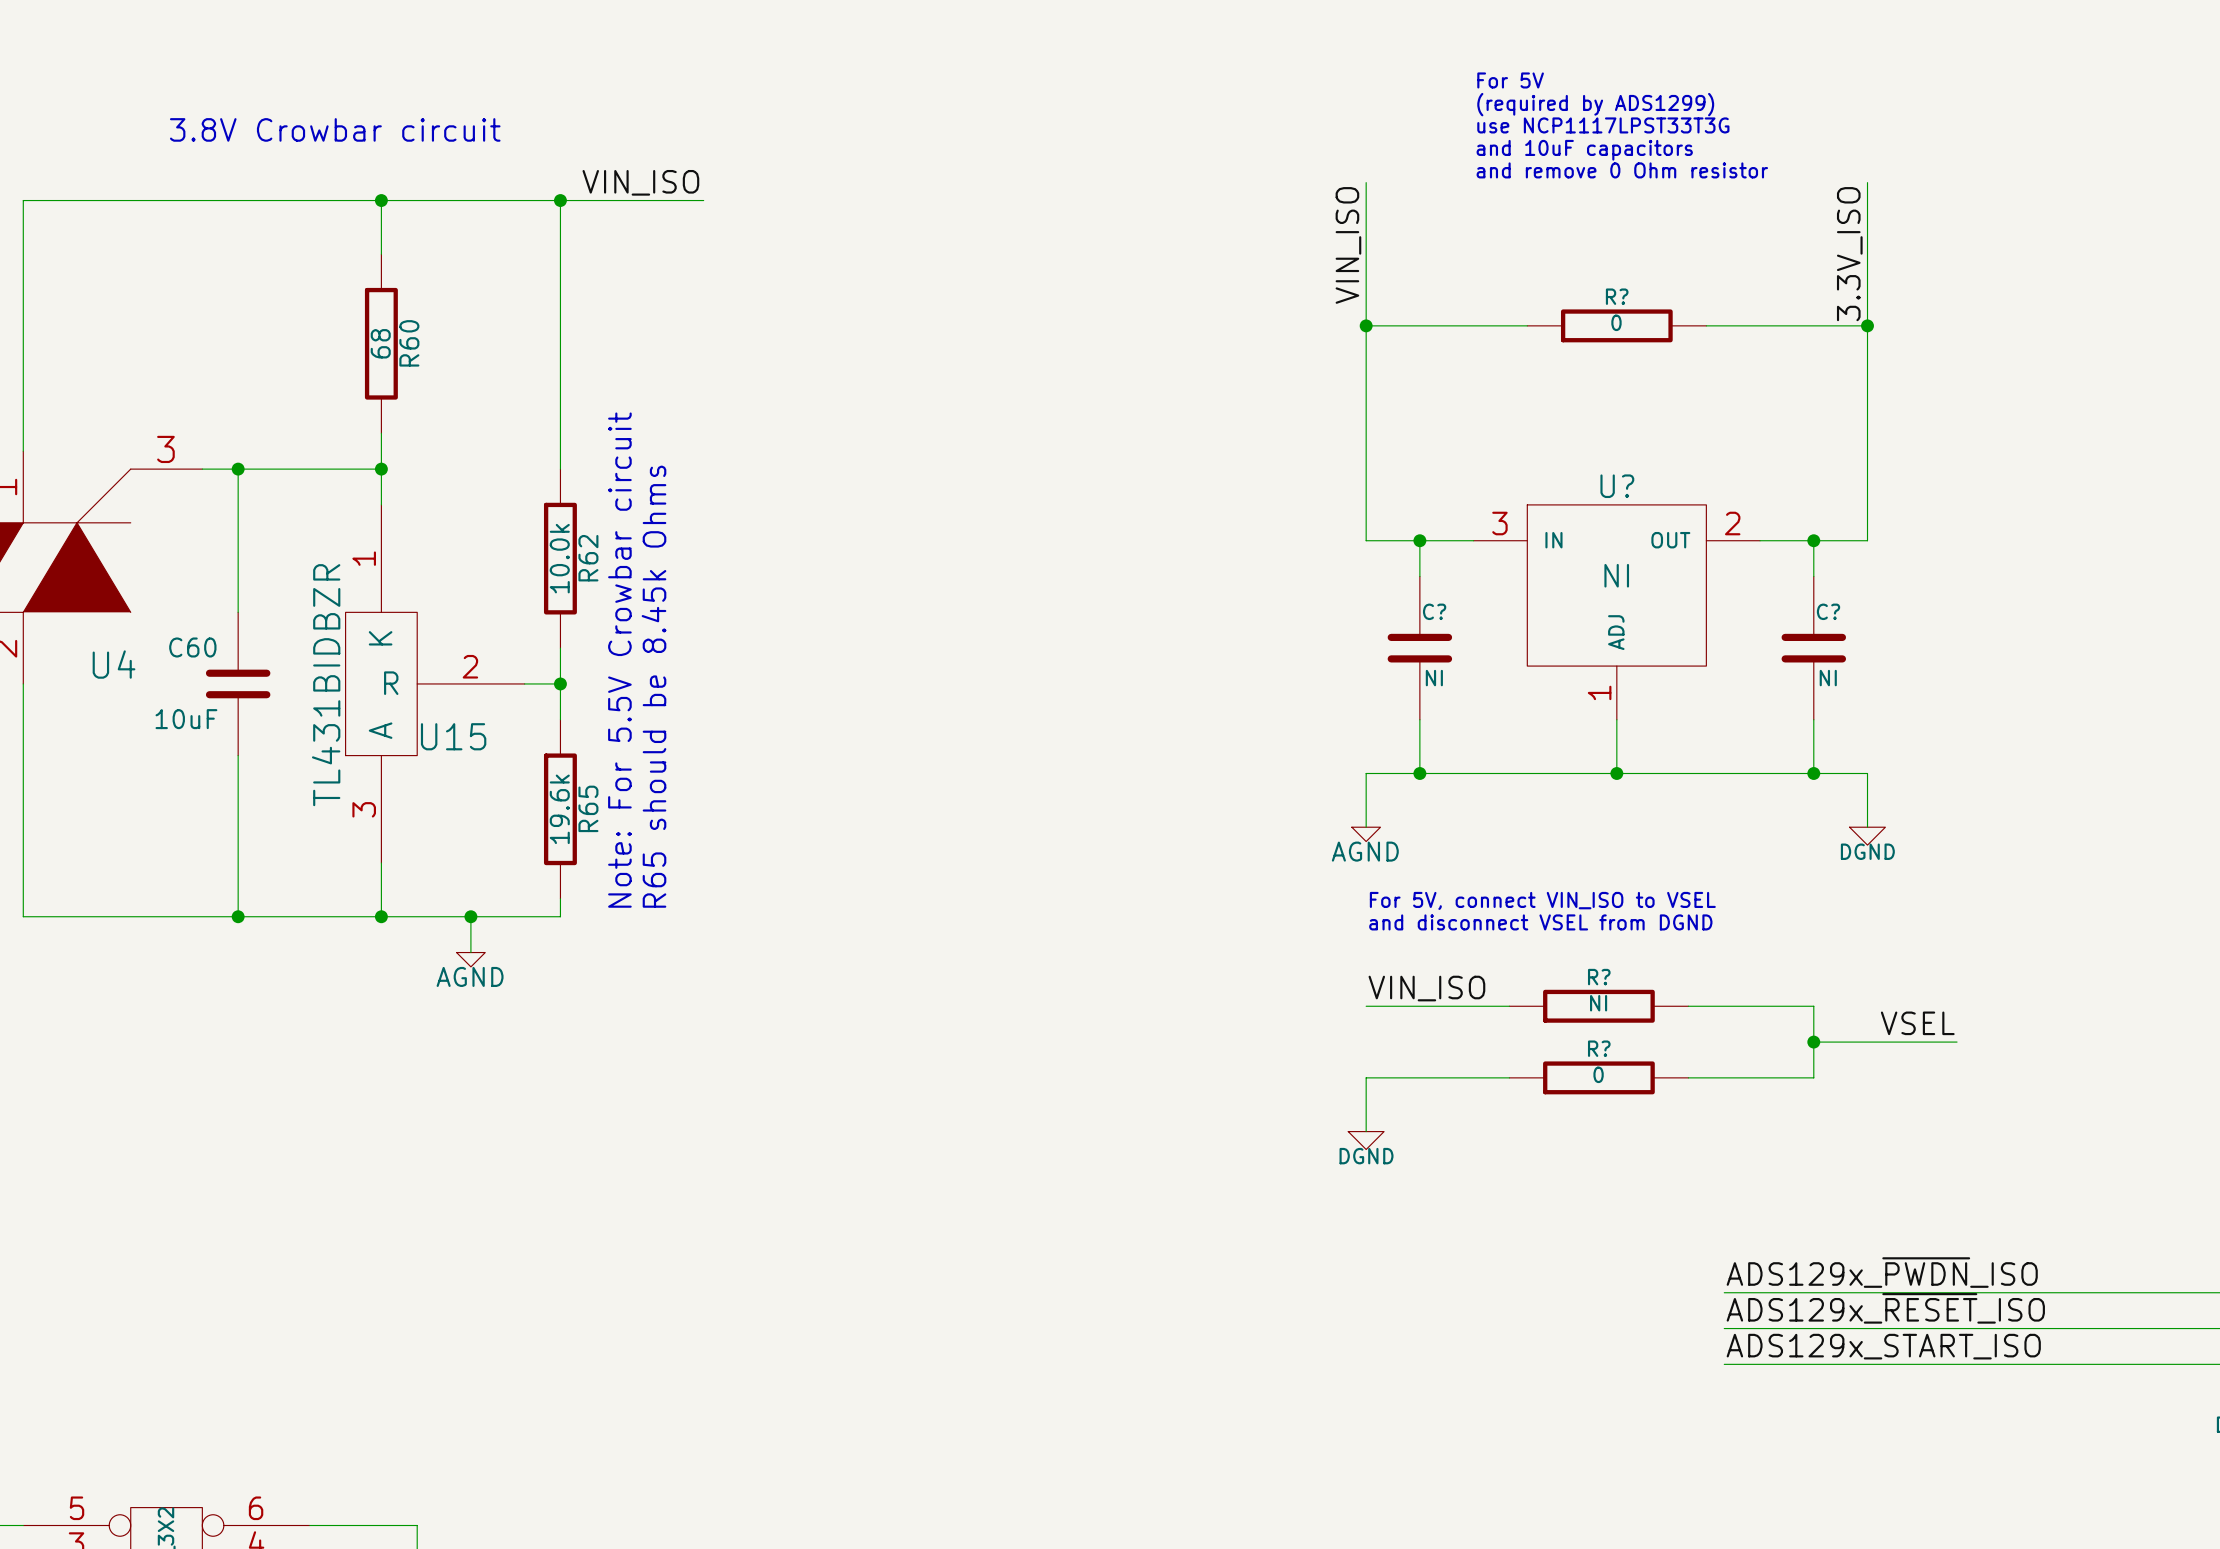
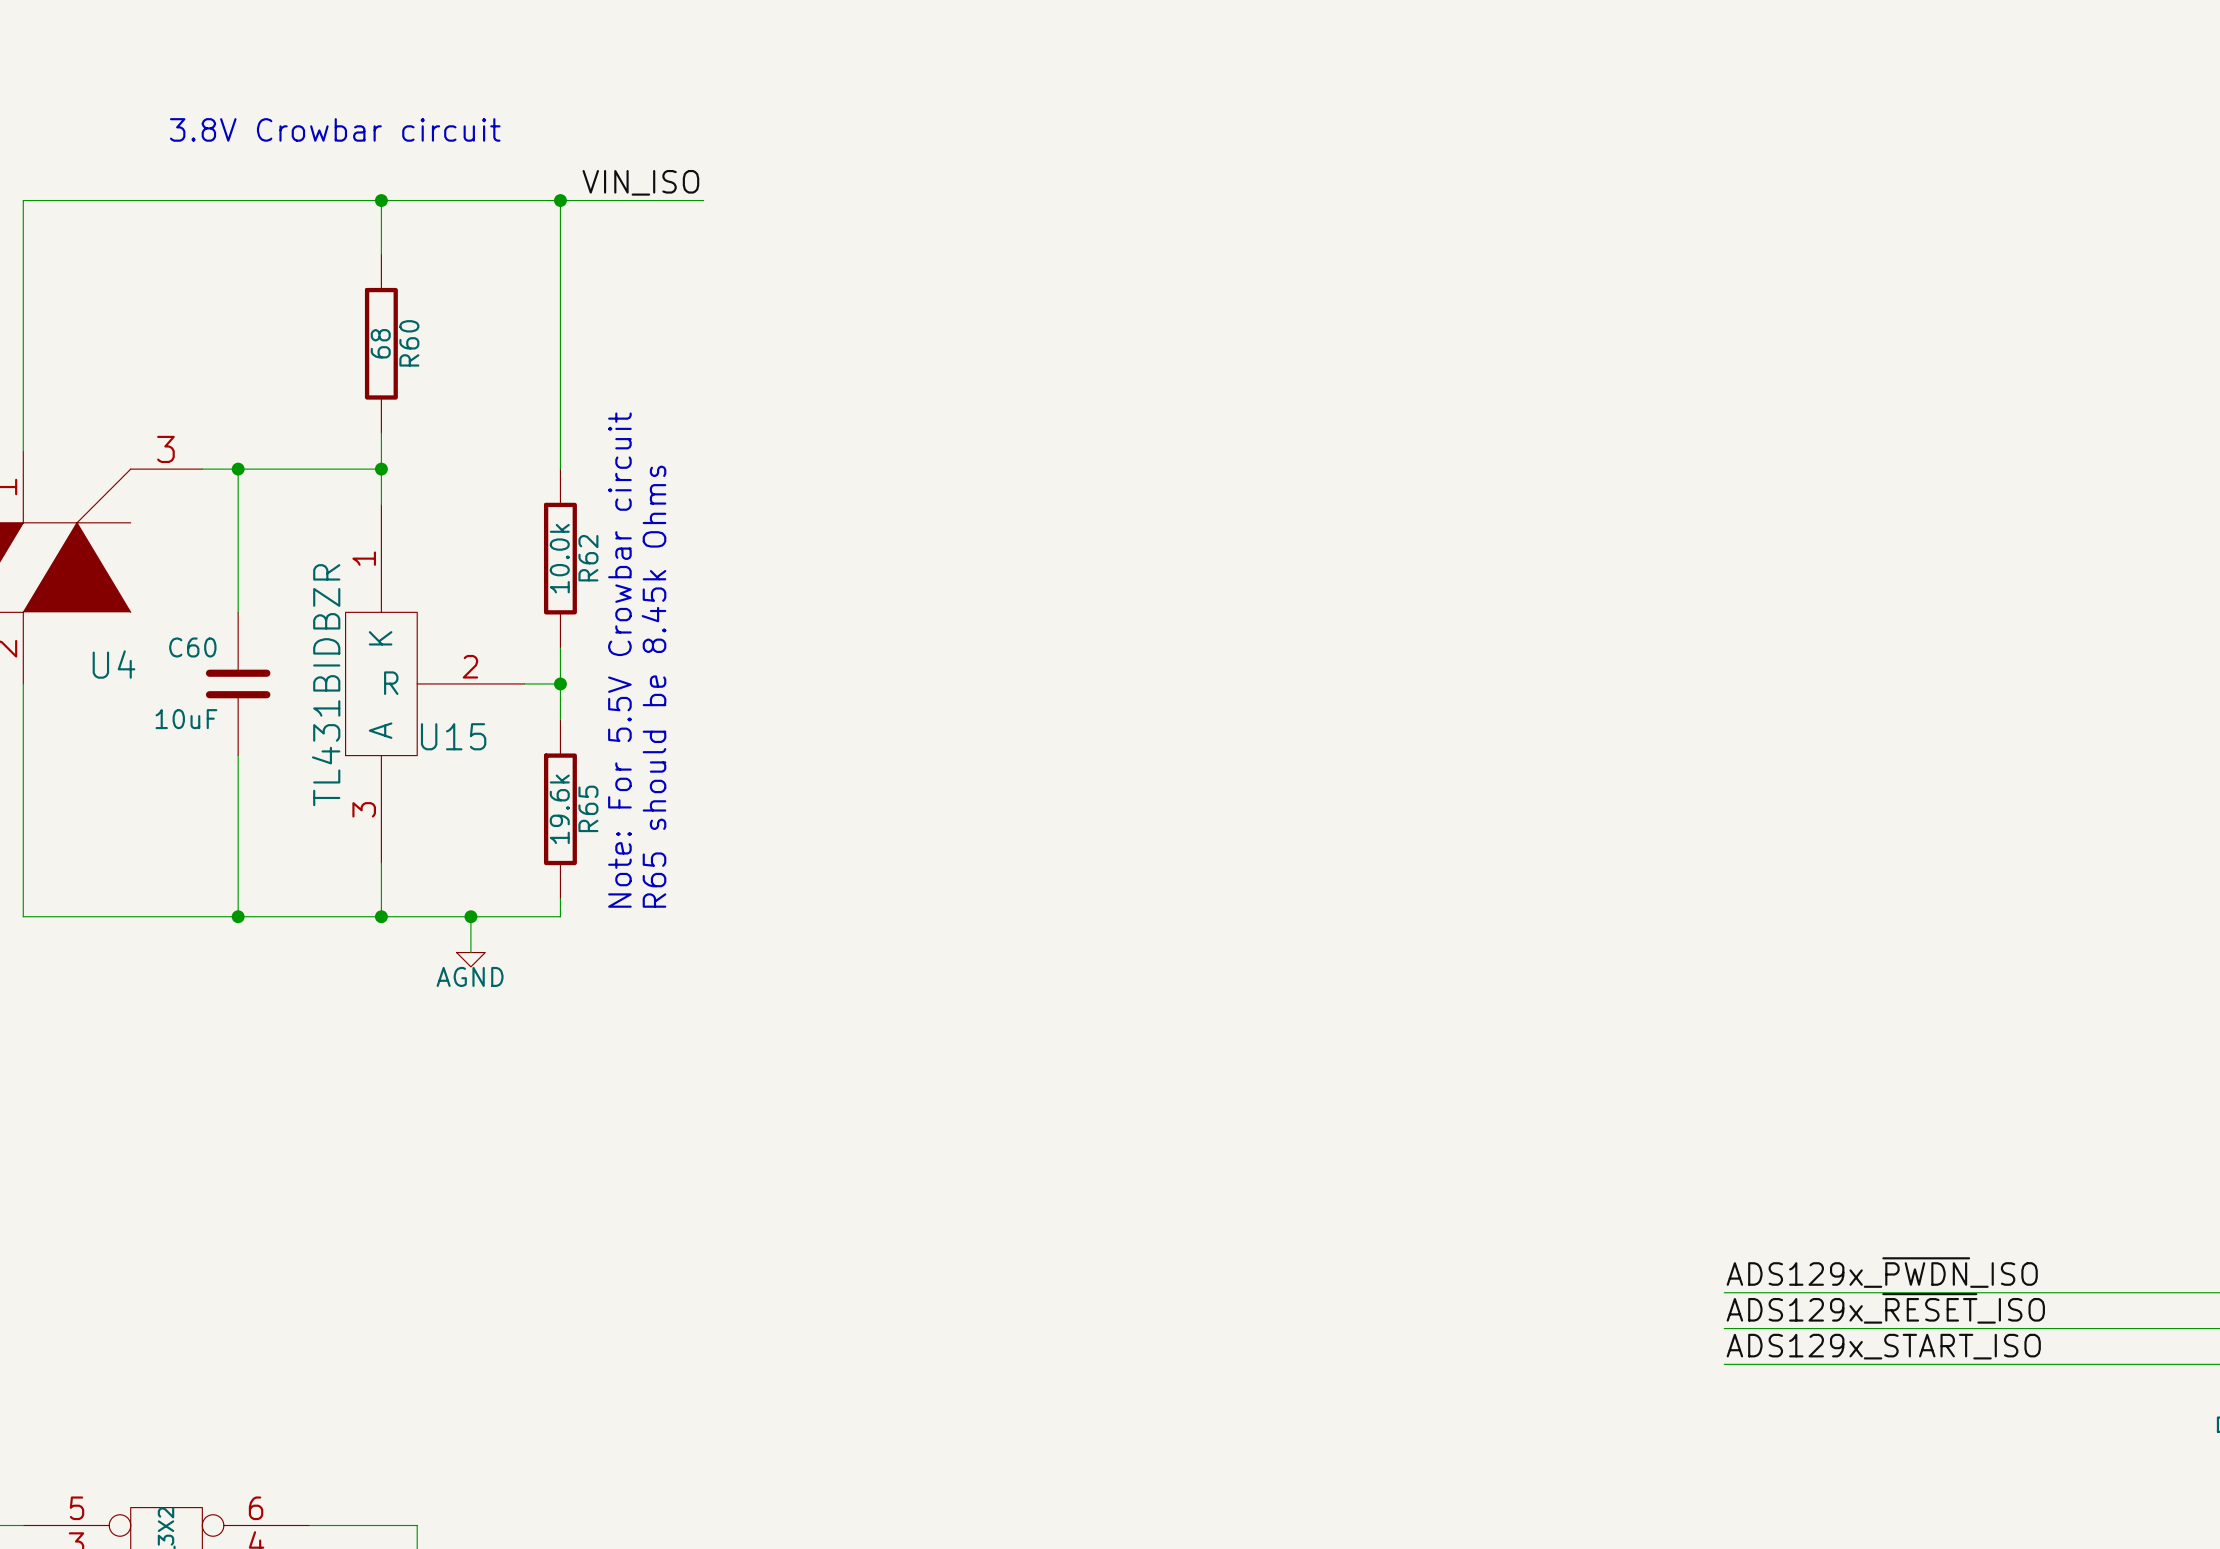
text: For 5V (1510, 80) -> none
text: (required by ADS1299) (1595, 104) -> none
text: use NCP1117LPST33T3G (1603, 125) -> none
text: and 10uF capacitors (1584, 150) -> none
text: and remove 0 Ohm resistor (1622, 170) -> none
wire: (1366, 182) (1366, 540) (1473, 540) -> none
wire: (1867, 182) (1867, 540) (1760, 540) -> none
label: VIN_ISO (1348, 245) -> none
label: 3.3V_ISO (1849, 254) -> none
wire: (1366, 325) (1527, 325) -> none
junction: (1366, 325) -> none
R?: 0 (1616, 325) -> none
wire: (1706, 325) (1867, 325) -> none
junction: (1867, 325) -> none
wire: (1419, 540) (1419, 576) -> none
junction: (1419, 540) -> none
wire: (1813, 540) (1813, 576) -> none
junction: (1813, 540) -> none
U?: NI (1616, 612) -> none
C?: NI (1419, 648) -> none
C?: NI (1813, 648) -> none
wire: (1419, 719) (1419, 773) -> none
wire: (1616, 719) (1616, 773) -> none
wire: (1813, 719) (1813, 773) -> none
junction: (1419, 773) -> none
junction: (1616, 773) -> none
junction: (1813, 773) -> none
wire: (1366, 827) (1366, 773) (1867, 773) (1867, 827) -> none
power symbol: AGND (1366, 834) -> none
power symbol: DGND (1867, 836) -> none
text: For 5V, connect VIN_ISO to VSEL (1542, 900) -> none
text: and disconnect VSEL from DGND (1540, 922) -> none
label: VIN_ISO (1426, 988) -> none
wire: (1366, 1006) (1509, 1006) -> none
R?: NI (1598, 1006) -> none
wire: (1688, 1006) (1813, 1006) (1813, 1077) (1688, 1077) -> none
label: VSEL (1917, 1023) -> none
wire: (1813, 1042) (1957, 1042) -> none
junction: (1813, 1042) -> none
wire: (1509, 1077) (1366, 1077) (1366, 1131) -> none
R?: 0 (1598, 1077) -> none
power symbol: DGND (1366, 1140) -> none

